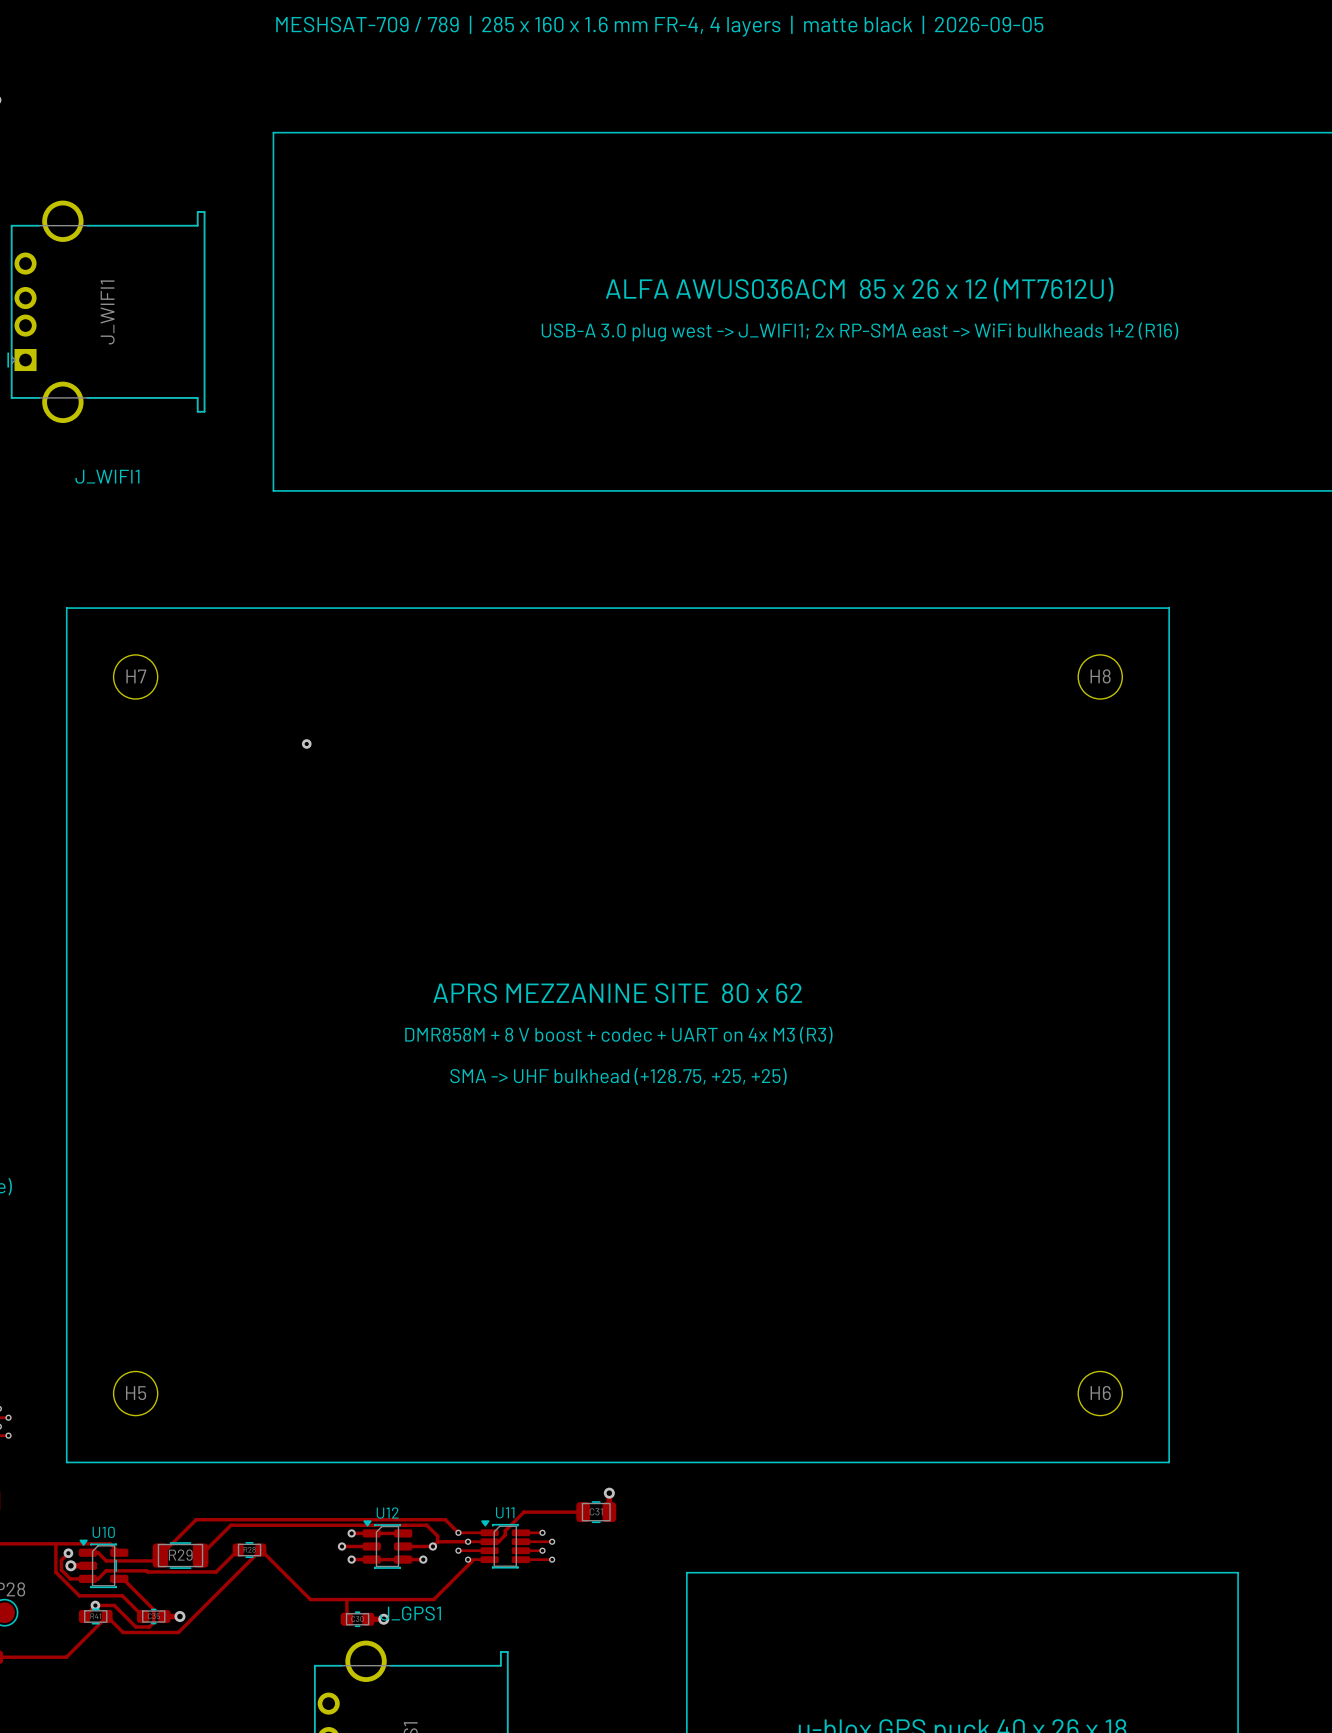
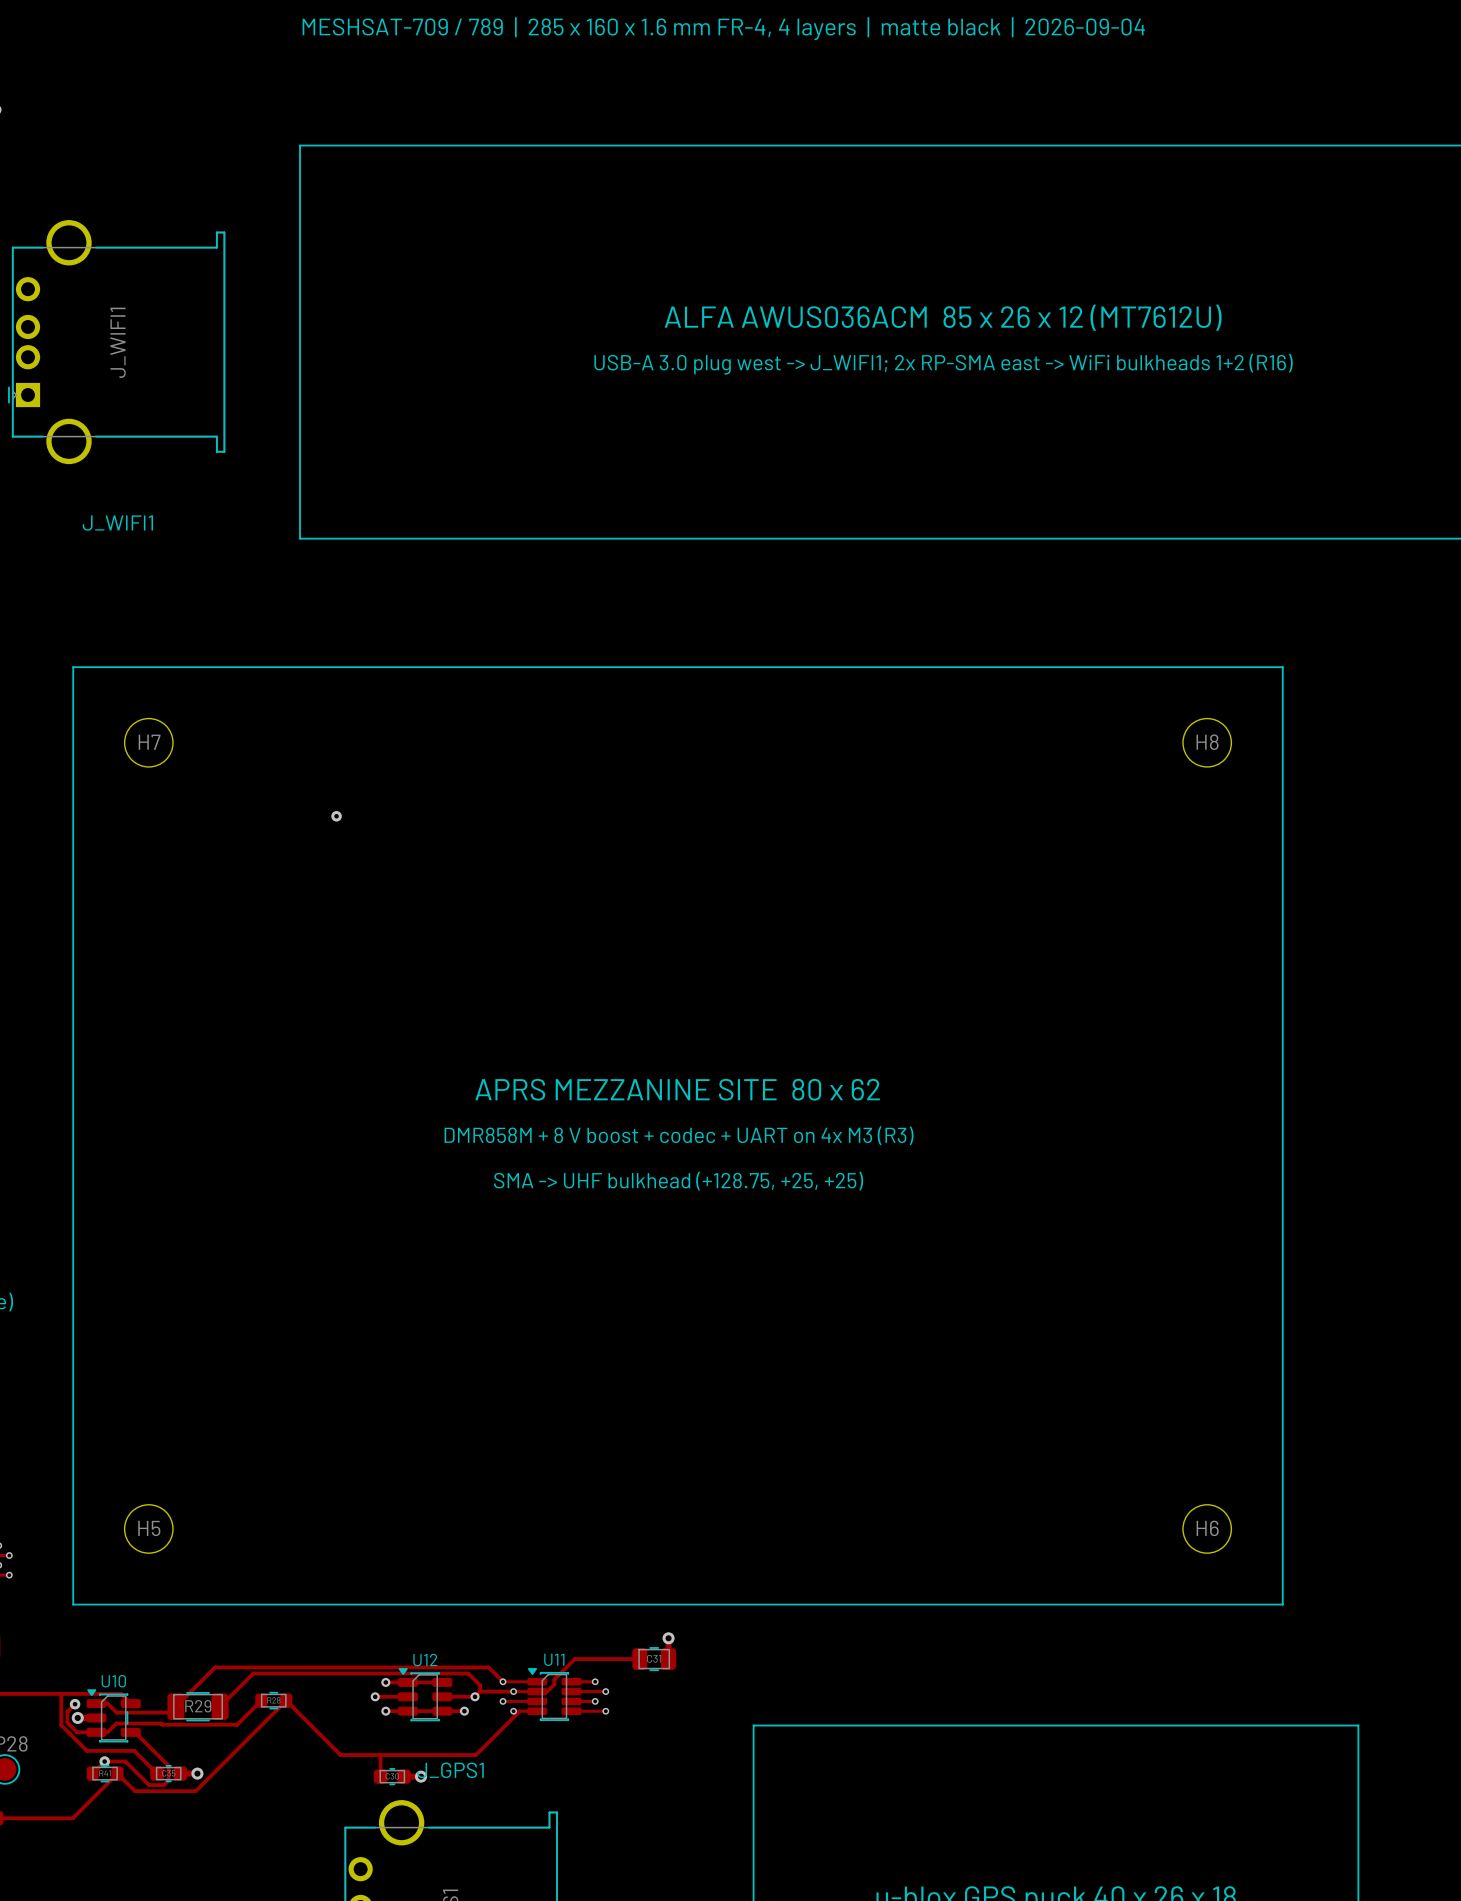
text: MESHSAT-709 / 789 | 285 x 160 x 1.6 mm FR-4, 4 layers | matte black | 2026-09-05 (659, 26) -> MESHSAT-709 / 789 | 285 x 160 x 1.6 mm FR-4, 4 layers | matte black | 2026-09-04 (723, 28)

